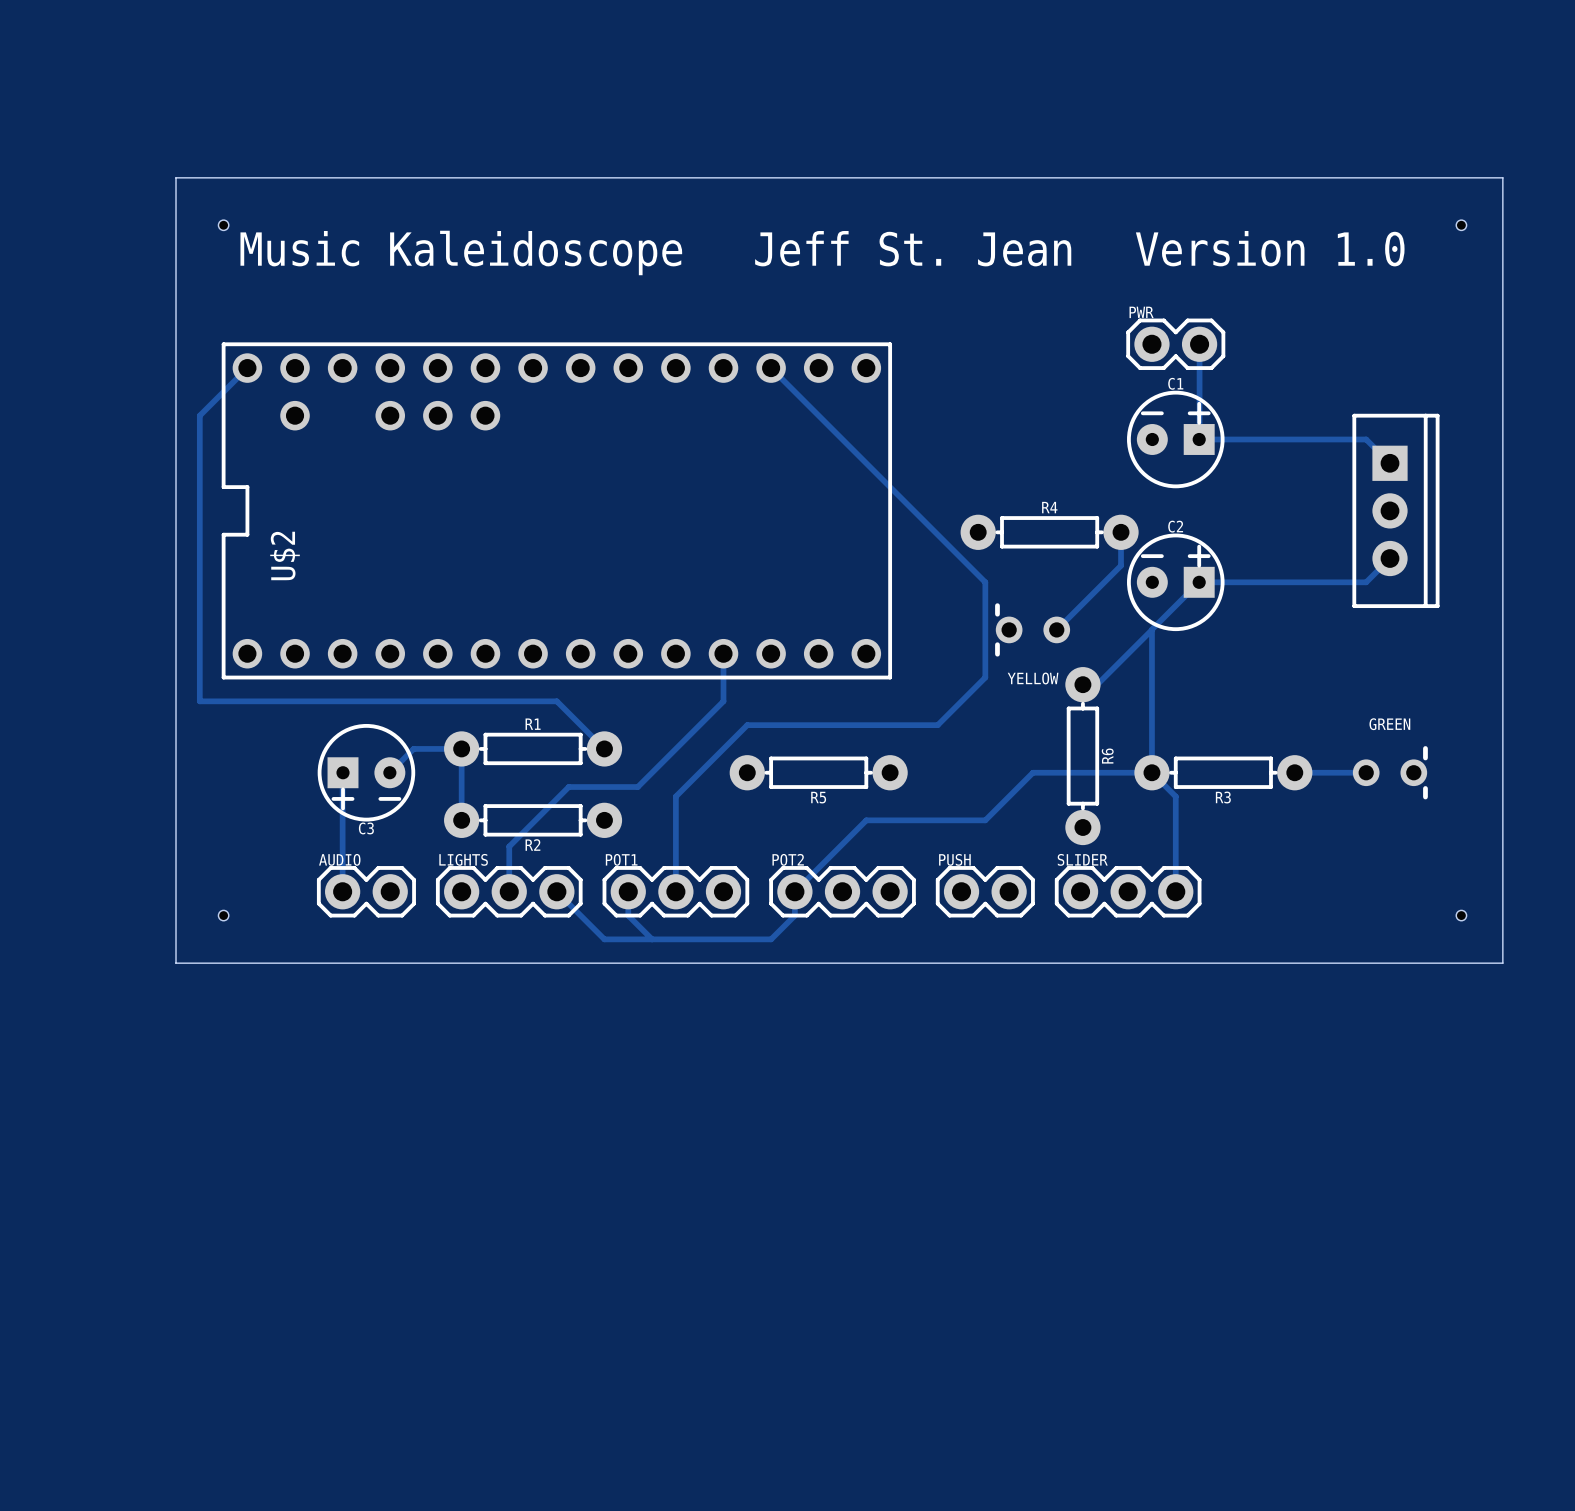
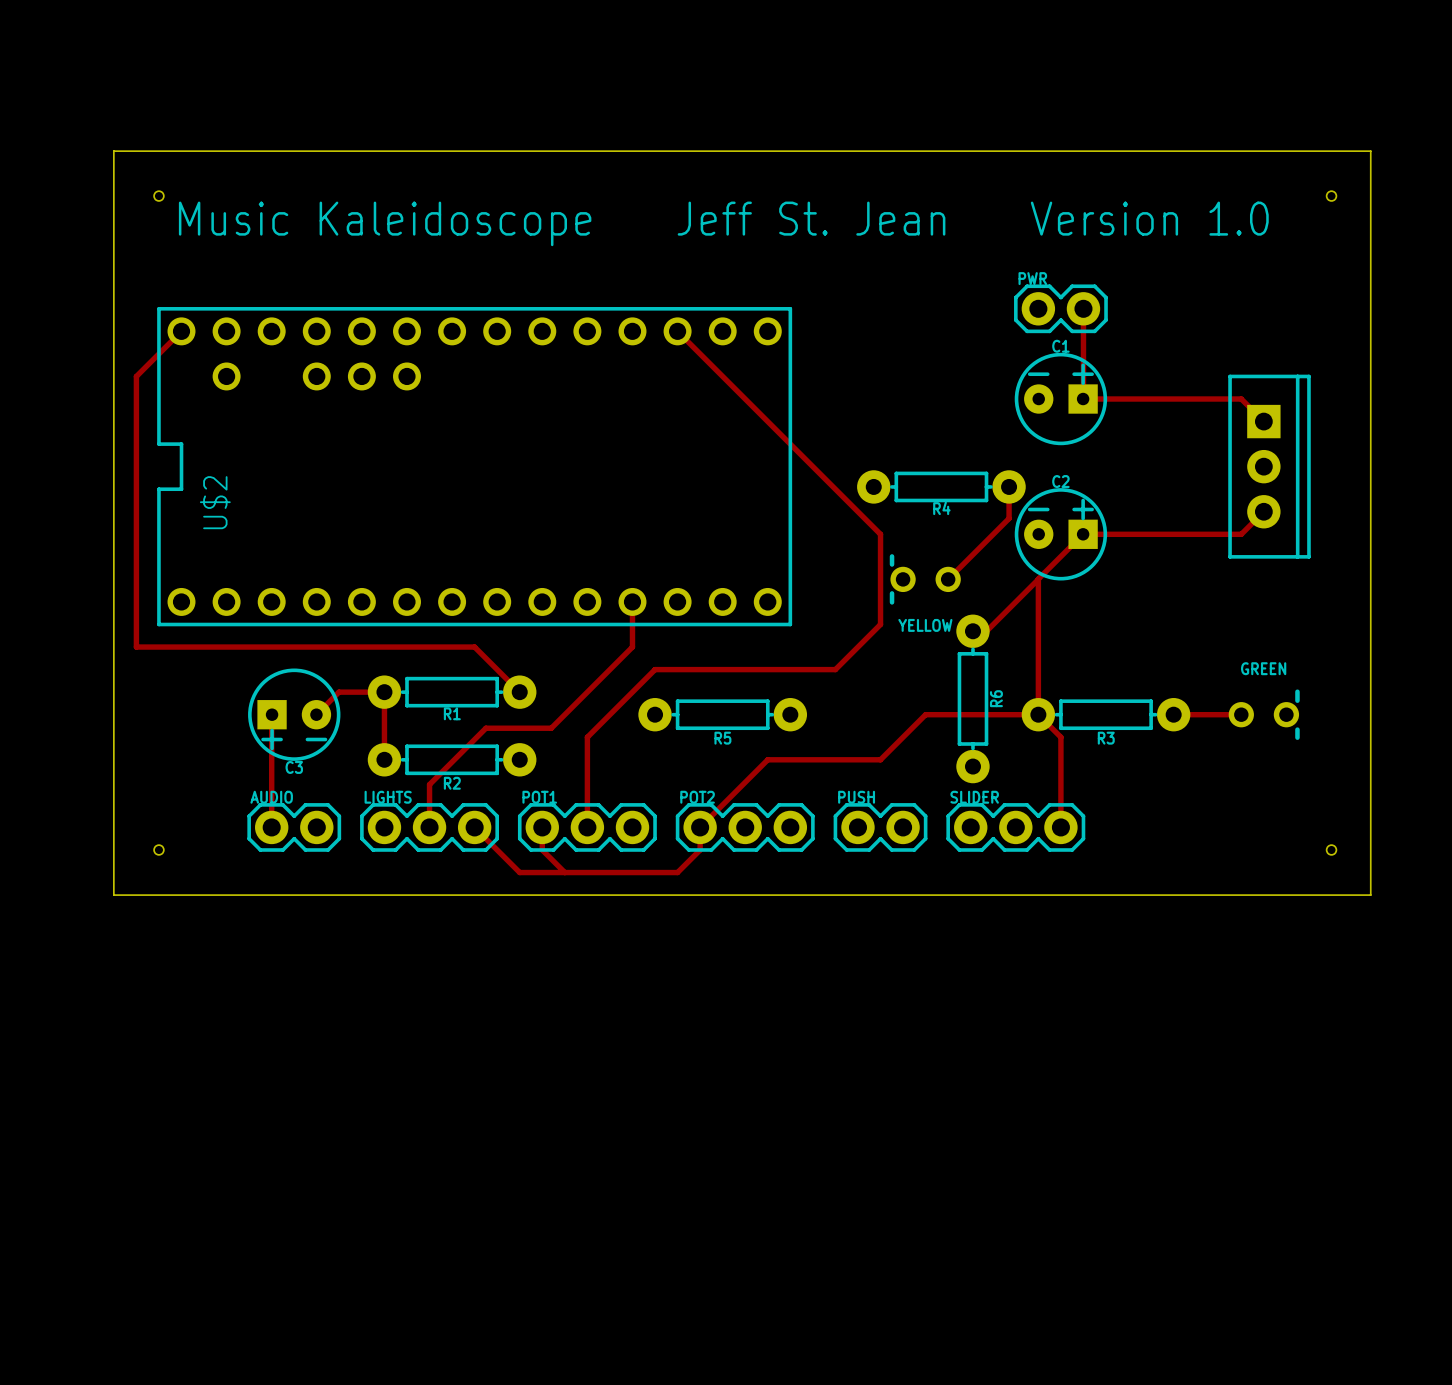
R4 name position: R4 (1049, 507) -> R4 (941, 508)
R1 name position: R1 (533, 724) -> R1 (452, 713)

